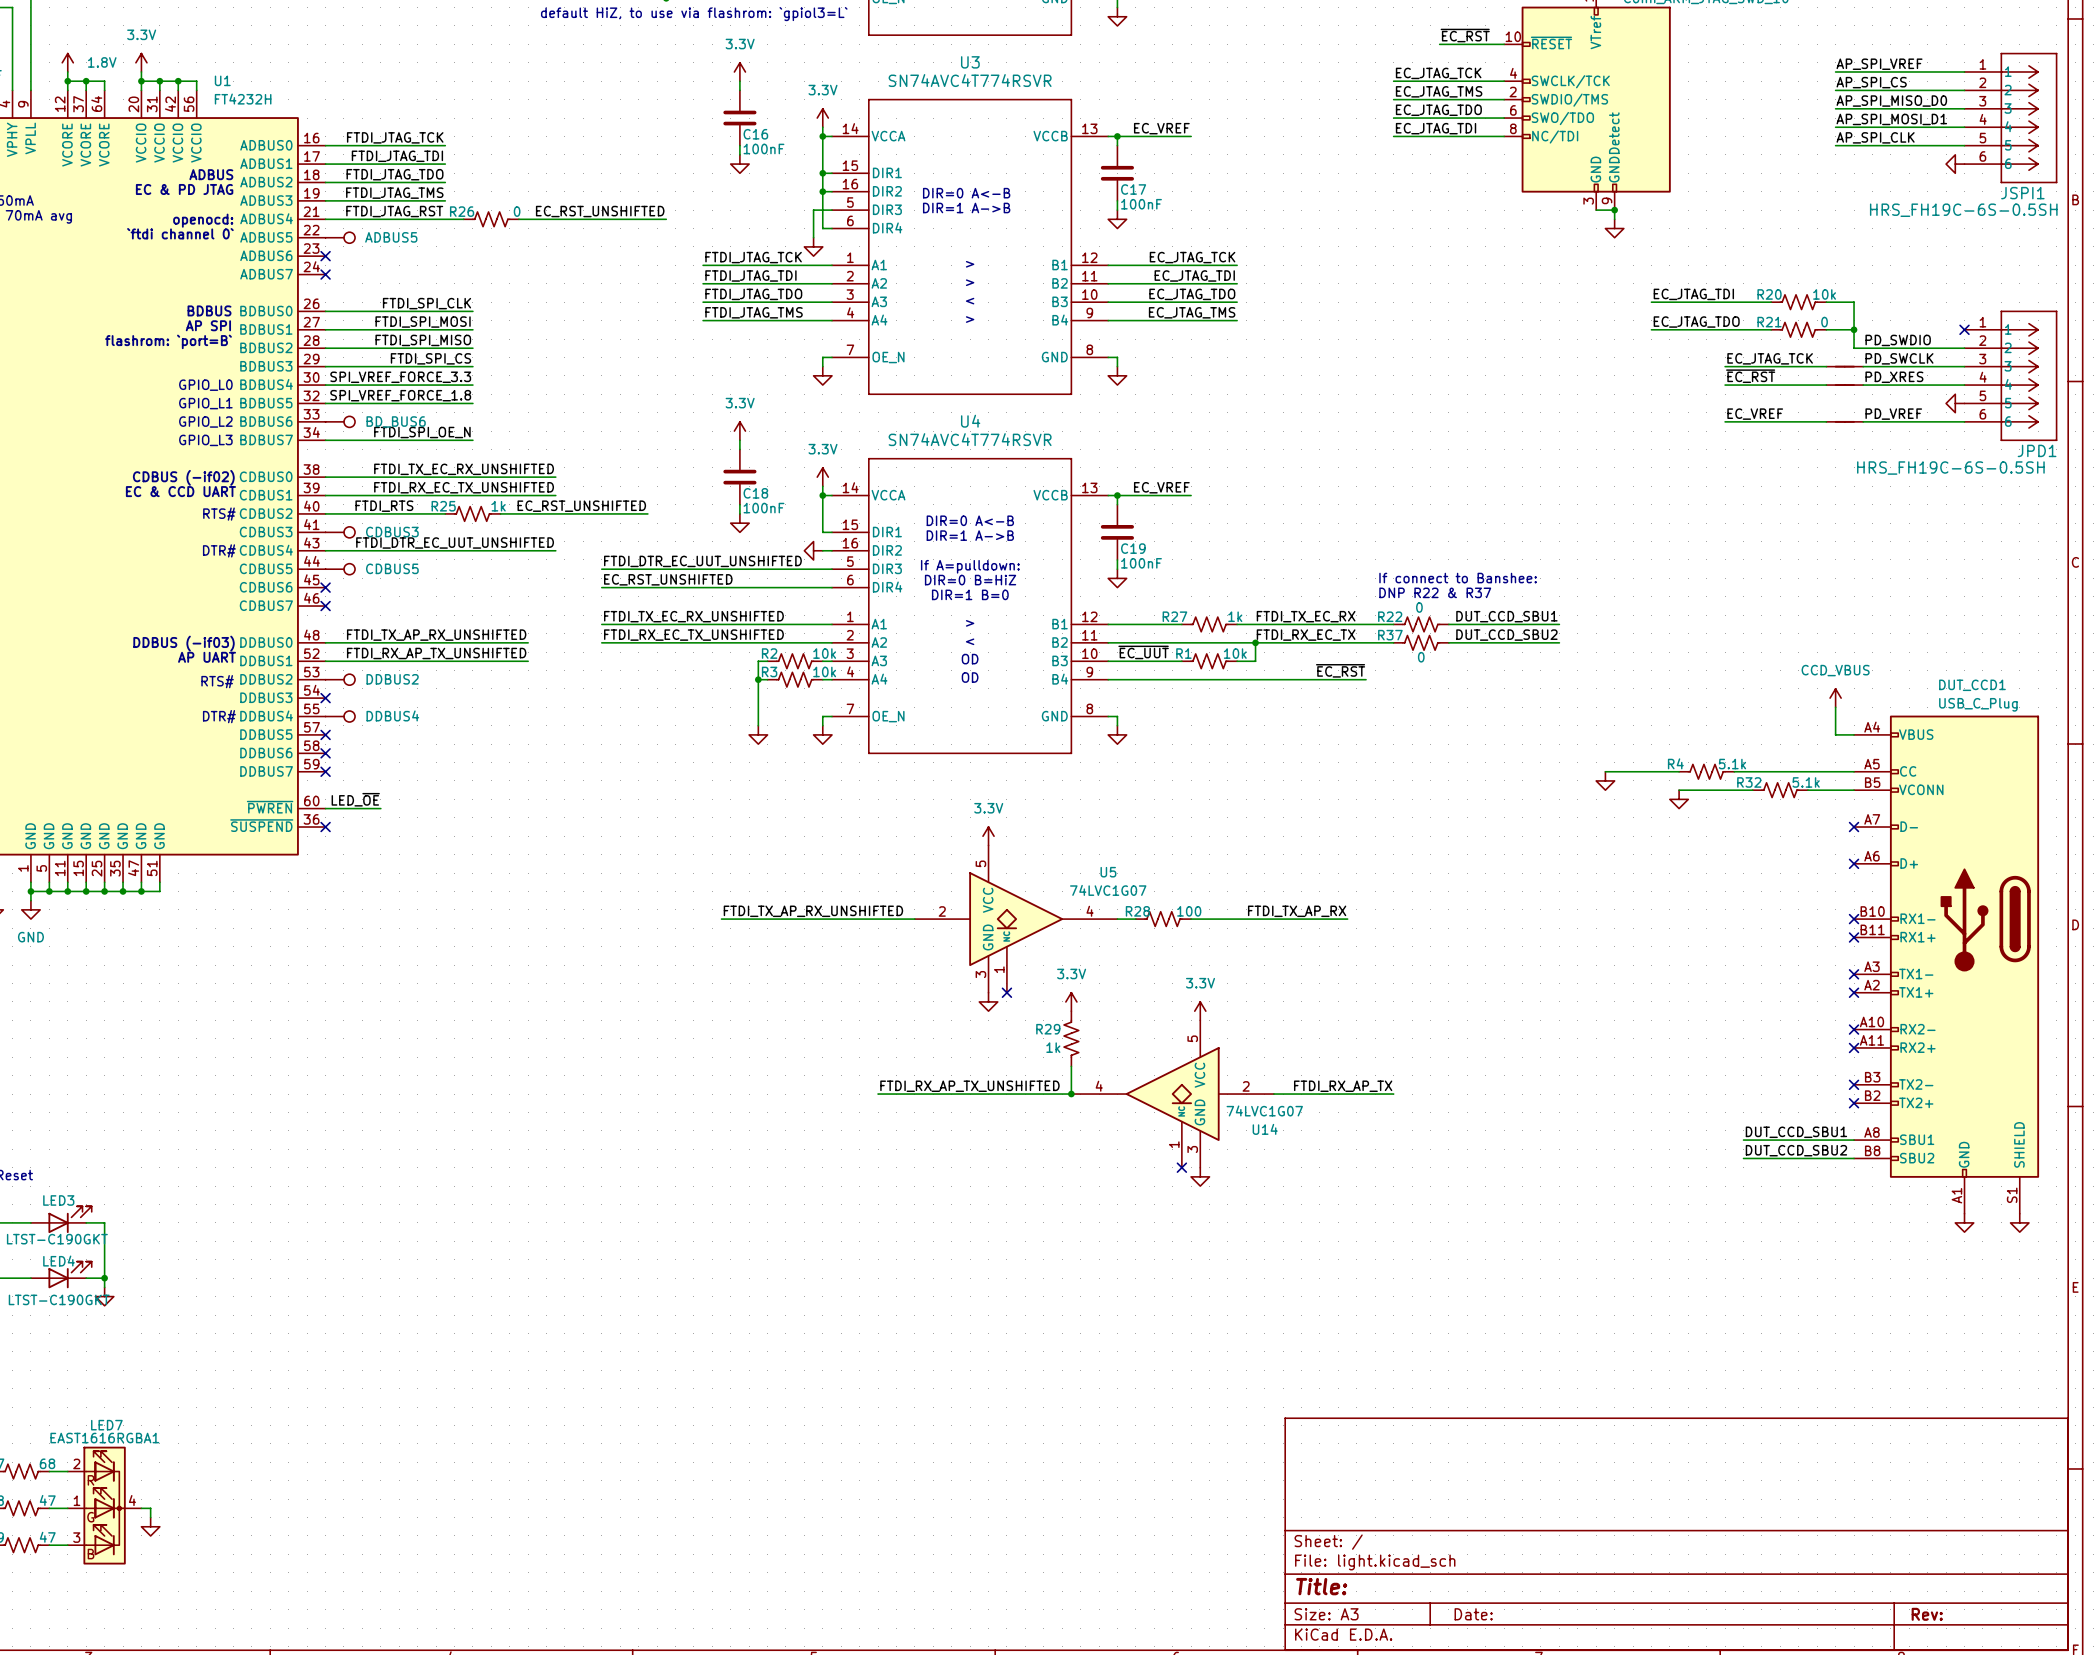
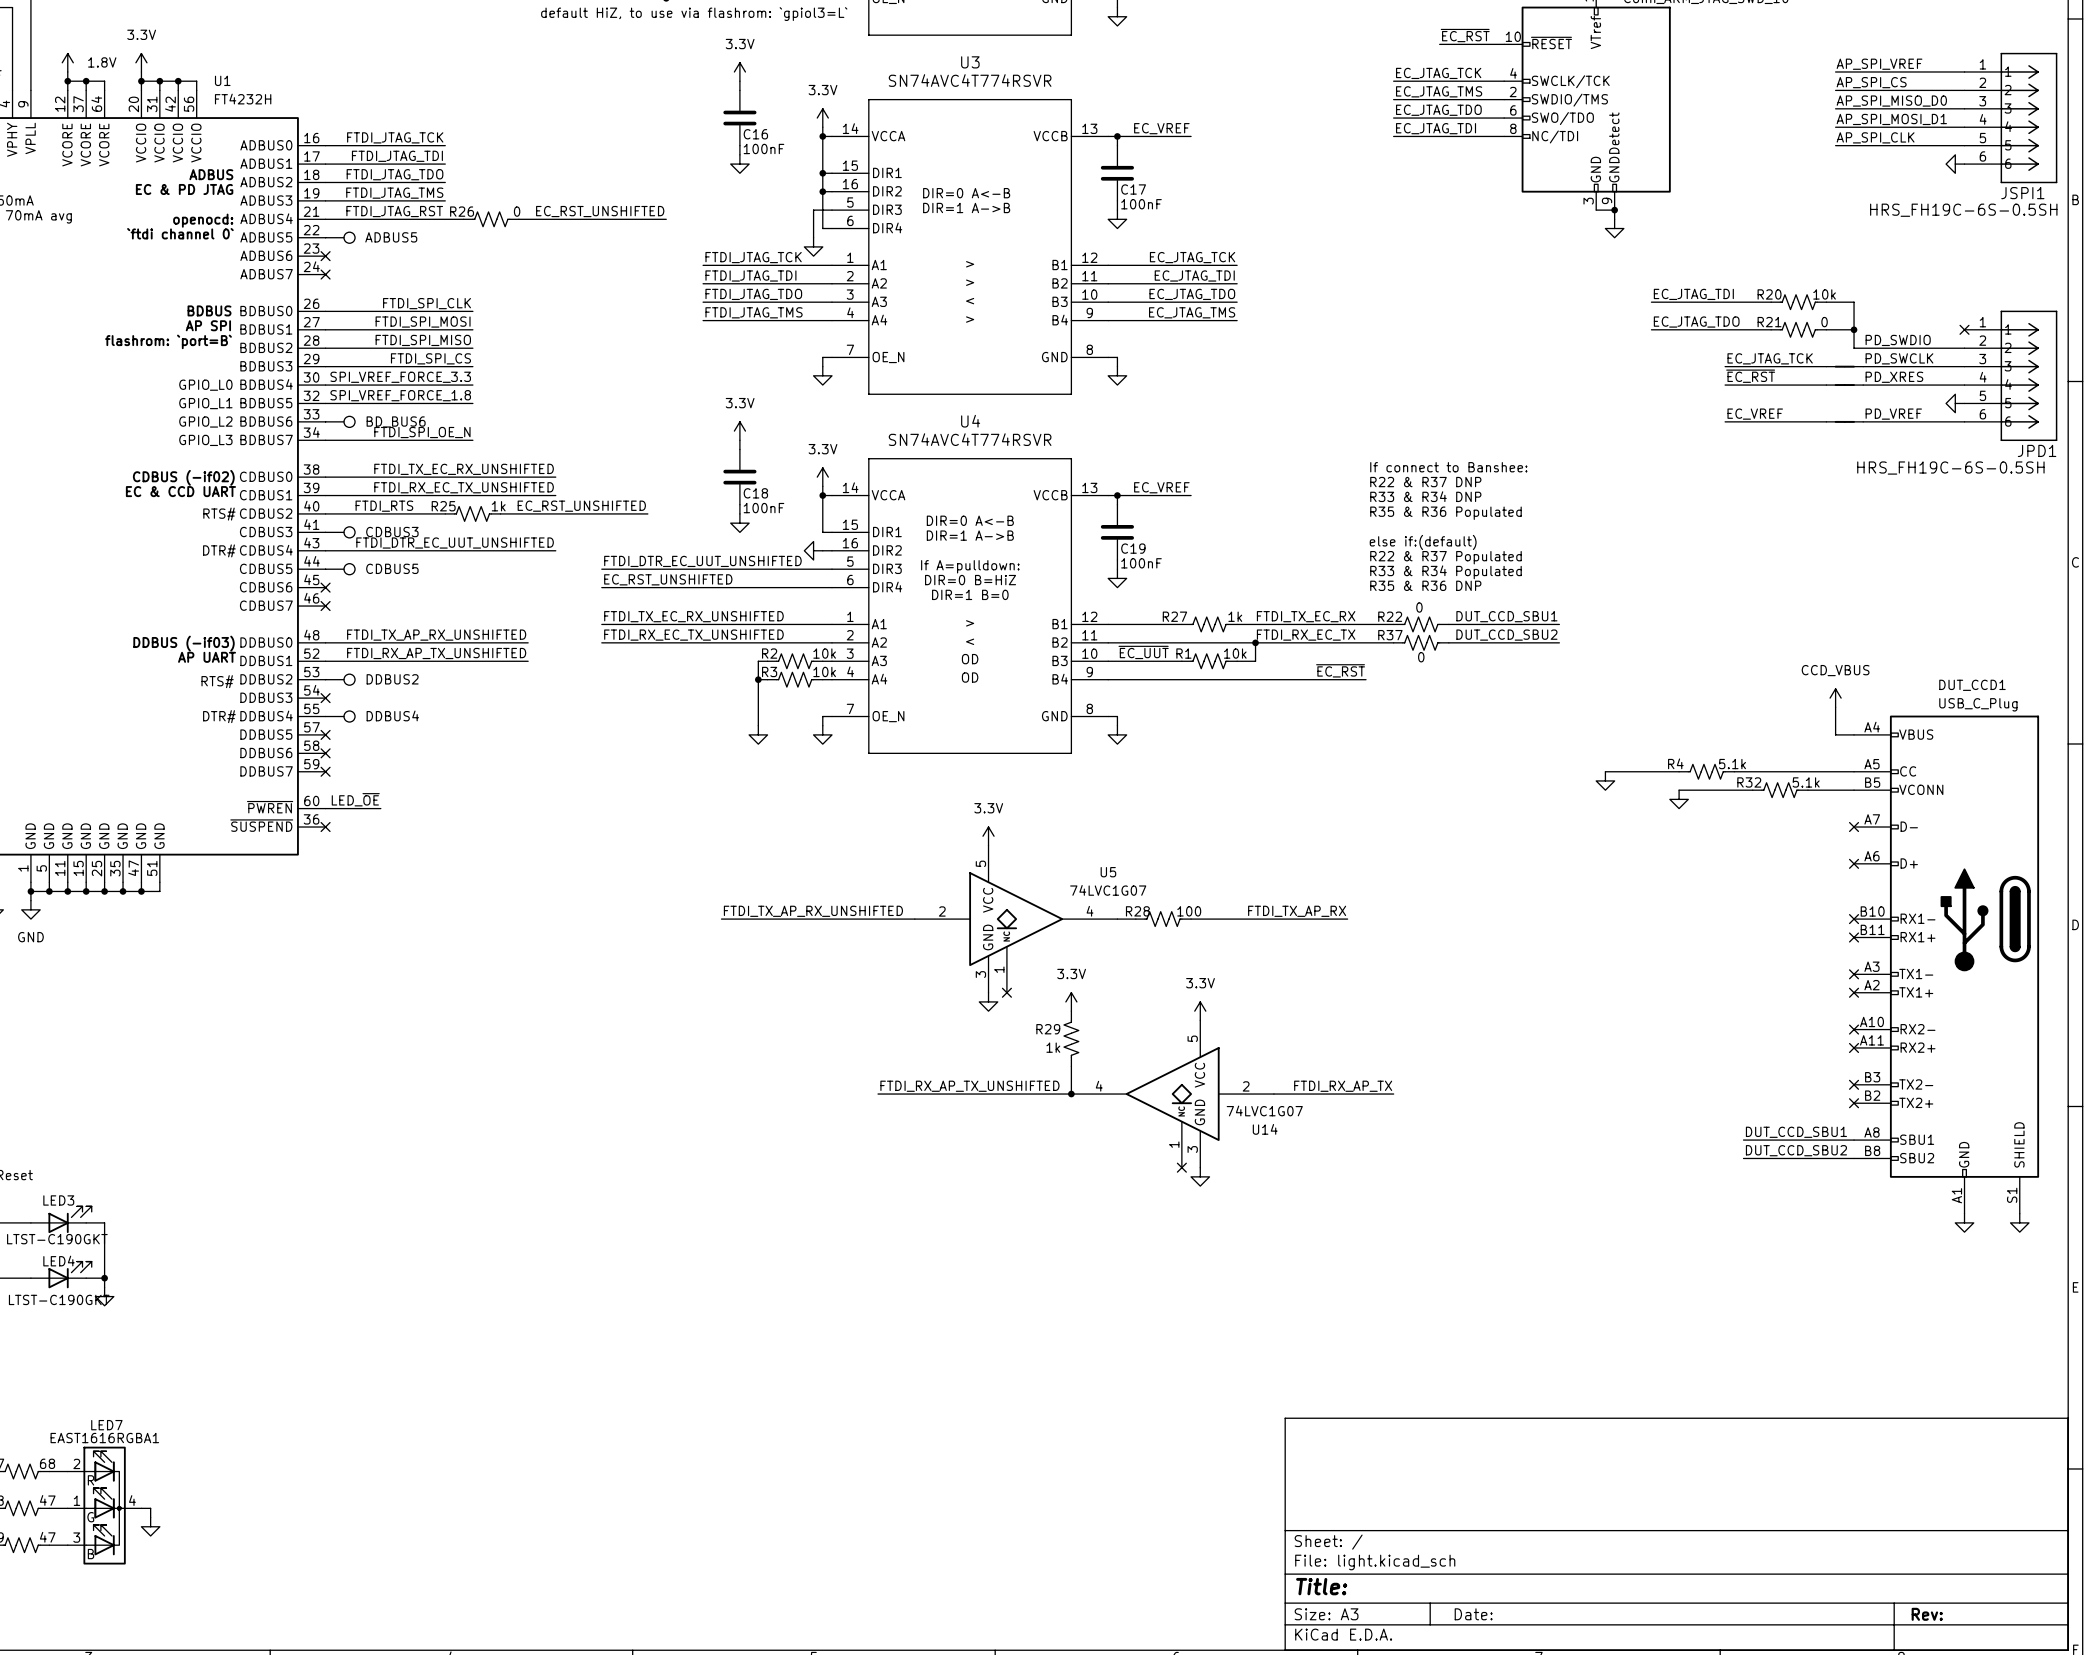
text: none -> R22 & R37 DNP (1425, 482)
text: none -> R33 & R34 DNP (1425, 496)
text: none -> R35 & R36 Populated (1445, 513)
text: none -> else if:(default) (1423, 542)
text: none -> R22 & R37 Populated (1445, 557)
text: none -> R33 & R34 Populated (1445, 572)
text position: If connect to Banshee: (1458, 578) -> If connect to Banshee: (1448, 467)
text: none -> R35 & R36 DNP (1425, 585)
text: DNP R22 & R37 (1435, 592) -> none

